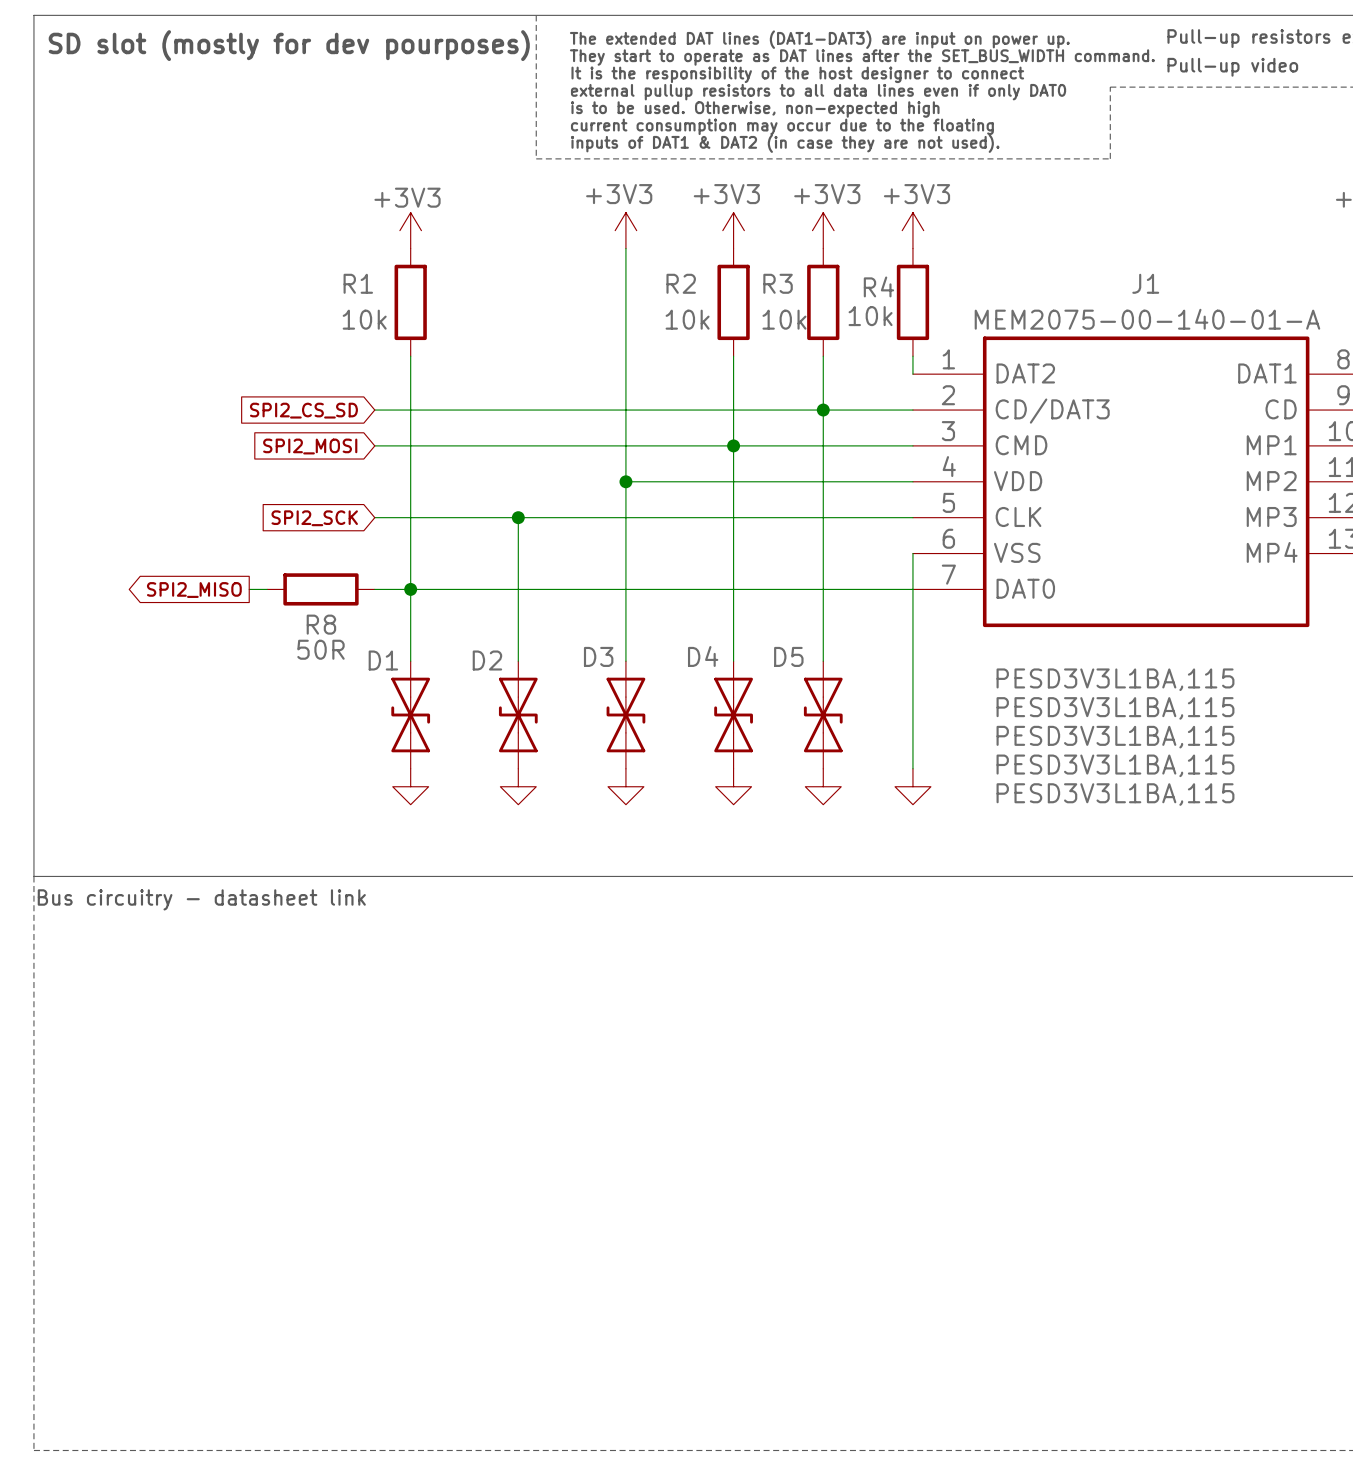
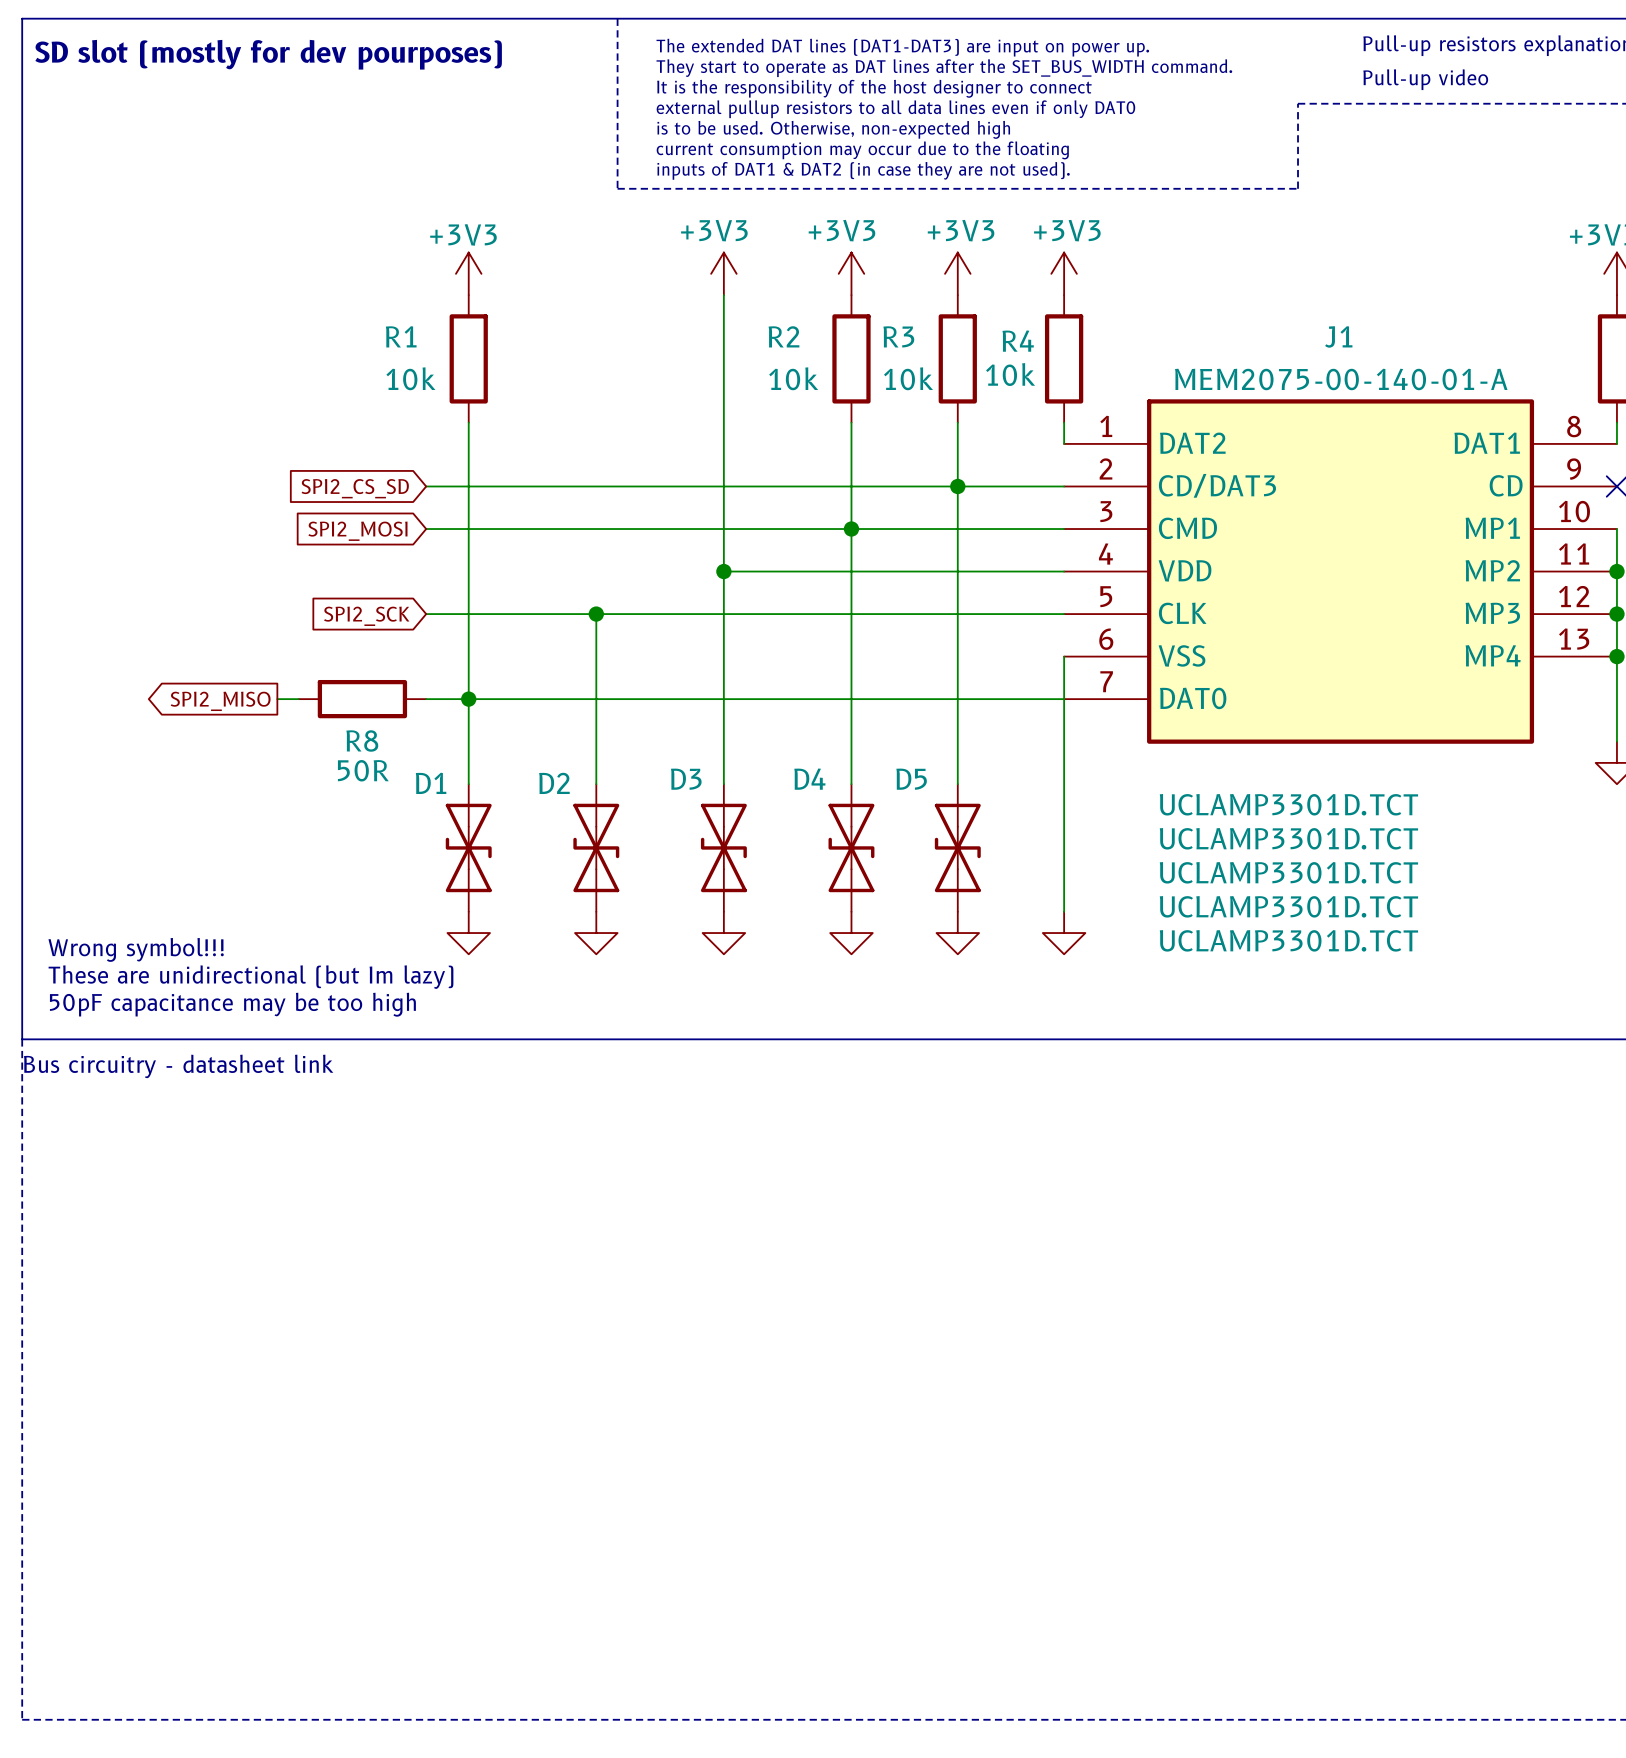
D4 value: PESD3V3L1BA,115 (1115, 679) -> UCLAMP3301D.TCT (1288, 804)
D2 value: PESD3V3L1BA,115 (1115, 708) -> UCLAMP3301D.TCT (1288, 838)
D3 value: PESD3V3L1BA,115 (1115, 737) -> UCLAMP3301D.TCT (1288, 872)
D5 value: PESD3V3L1BA,115 (1115, 765) -> UCLAMP3301D.TCT (1288, 906)
D1 value: PESD3V3L1BA,115 (1115, 794) -> UCLAMP3301D.TCT (1288, 940)
text: none -> Wrong symbol!!! (136, 949)
text: none -> These are unidirectional (but Im lazy) (250, 977)
text: none -> 50pF capacitance may be too high (232, 1004)

